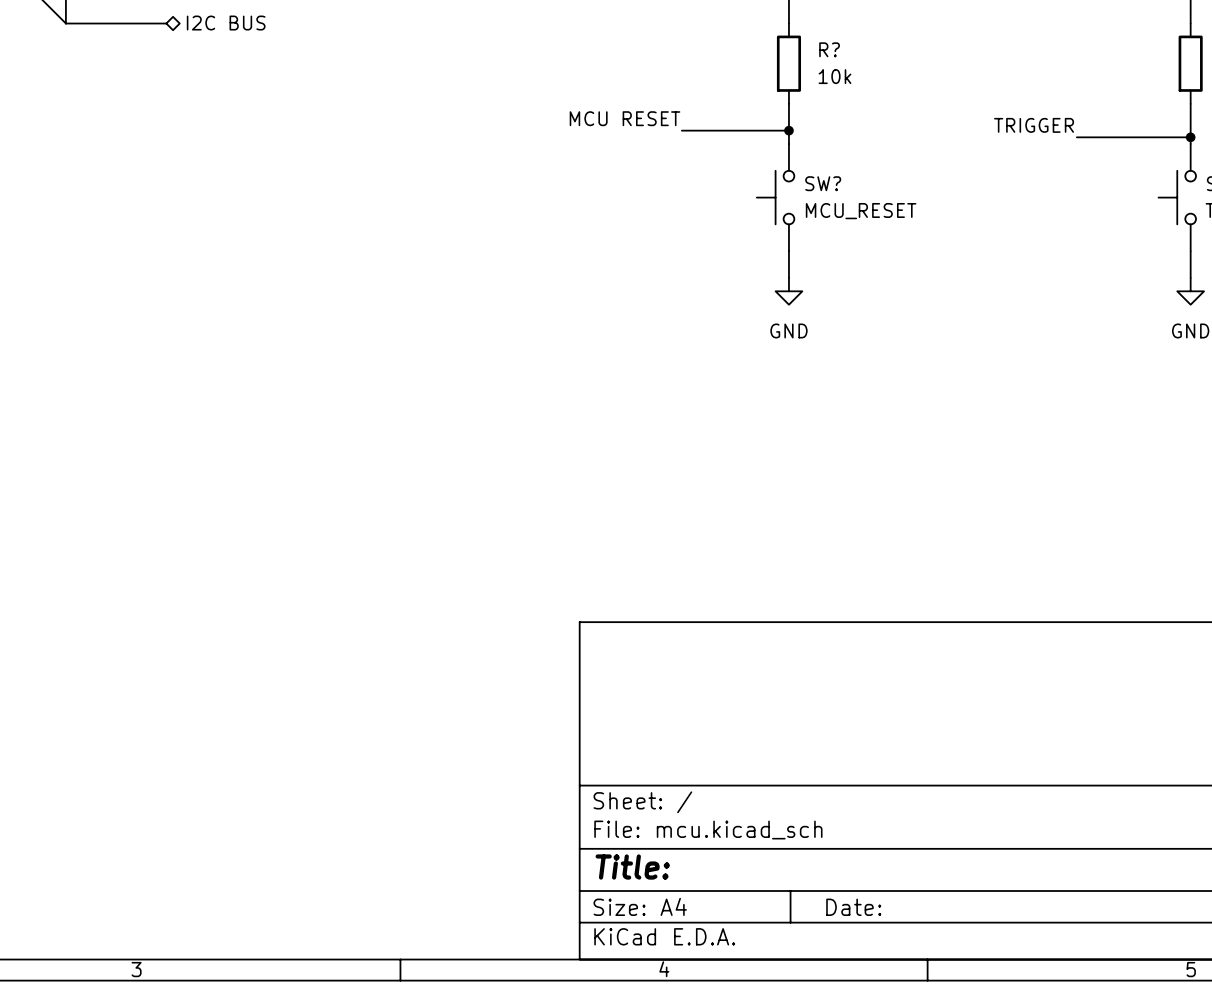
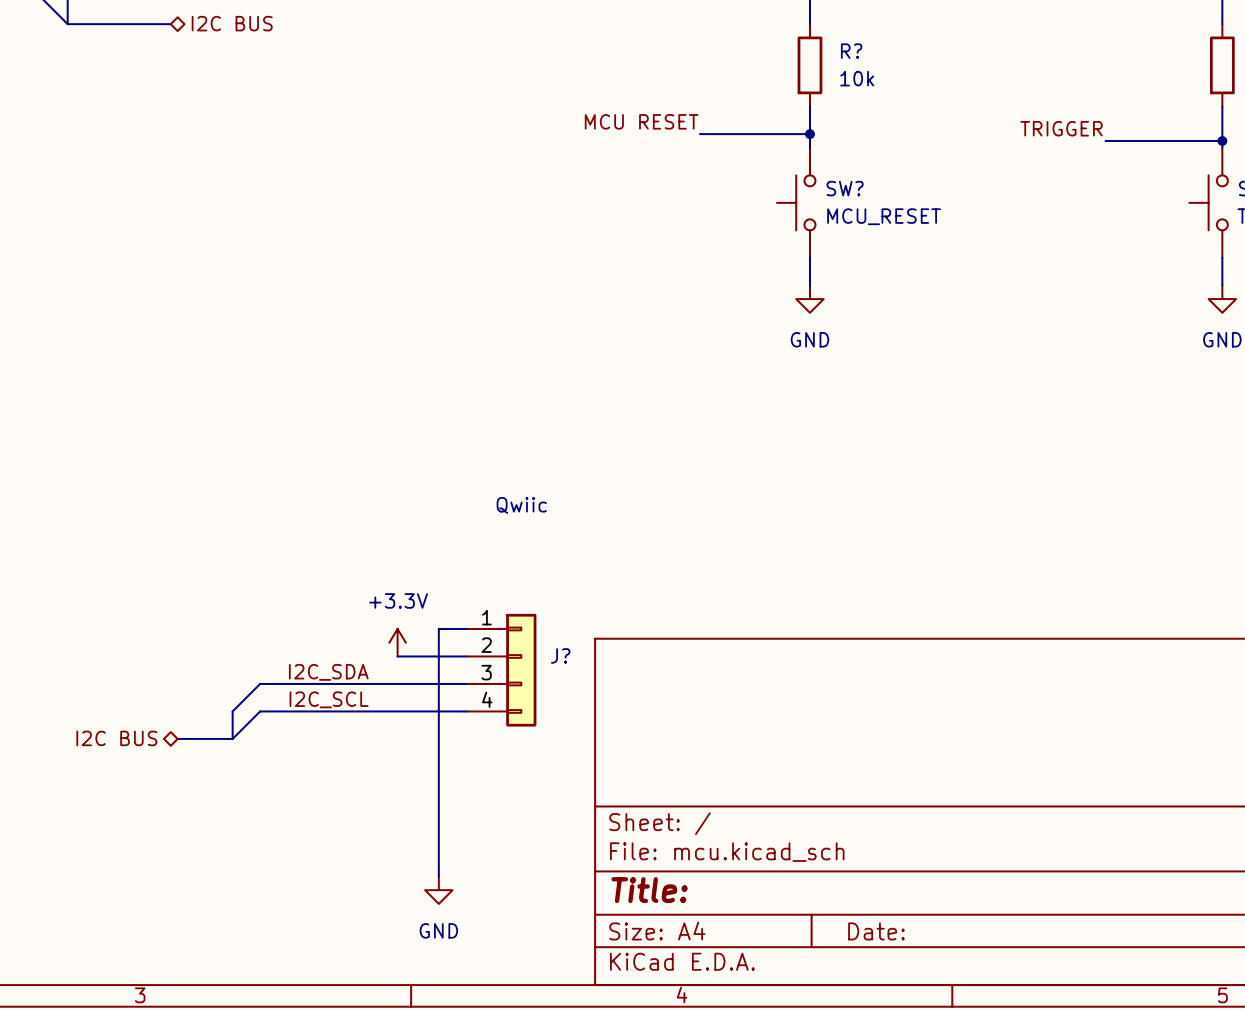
wire: none -> (466, 628) (438, 628) (438, 876)
power symbol: none -> +3.3V (397, 642)
wire: none -> (397, 656) (466, 656)
J?: none -> Qwiic (501, 670)
label: none -> I2C_SDA (328, 672)
wire: none -> (466, 683) (260, 683) (232, 711)
label: none -> I2C_SCL (329, 699)
bus: none -> (232, 711) (232, 738) (177, 738)
wire: none -> (466, 711) (260, 711) (232, 738)
hierarchical label: none -> I2C BUS (116, 738)
power symbol: none -> GND (438, 890)

